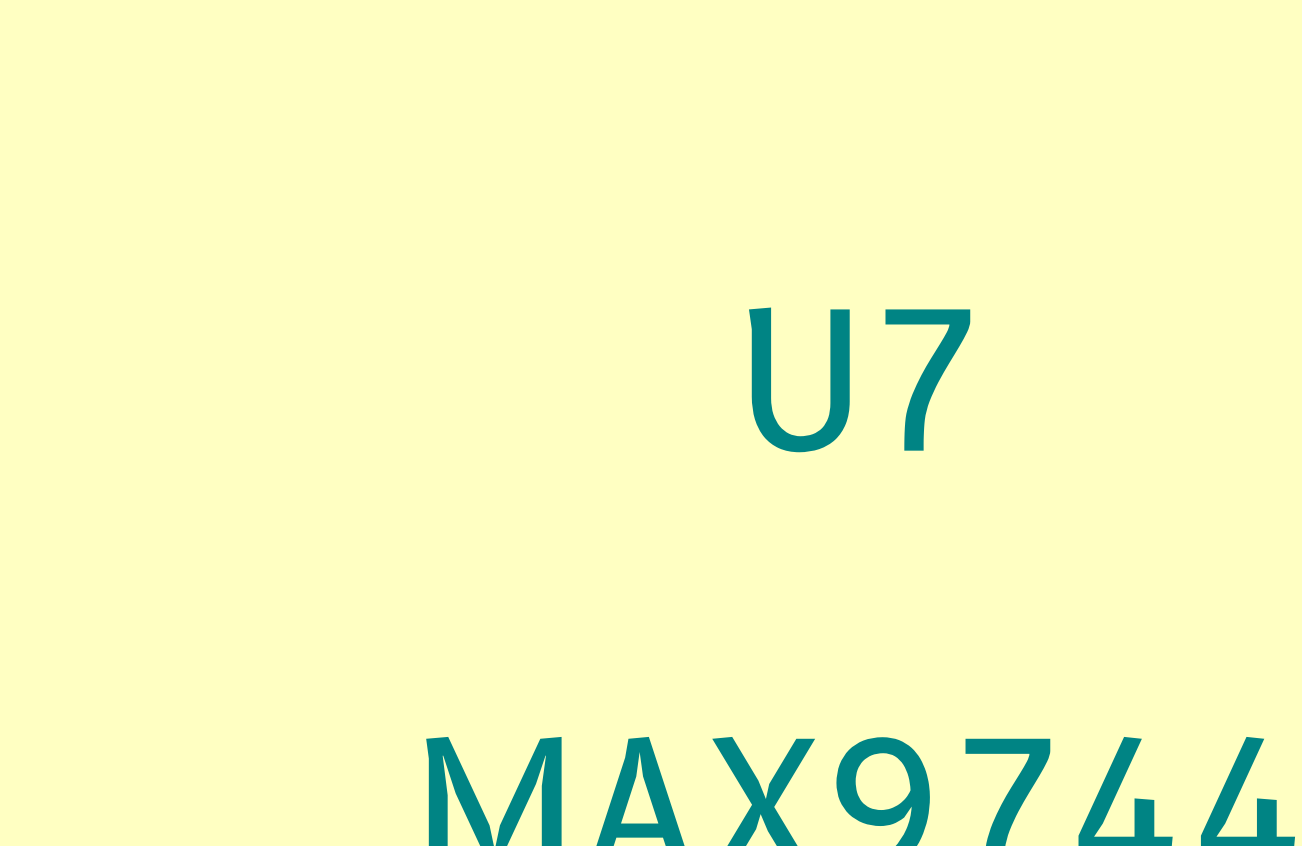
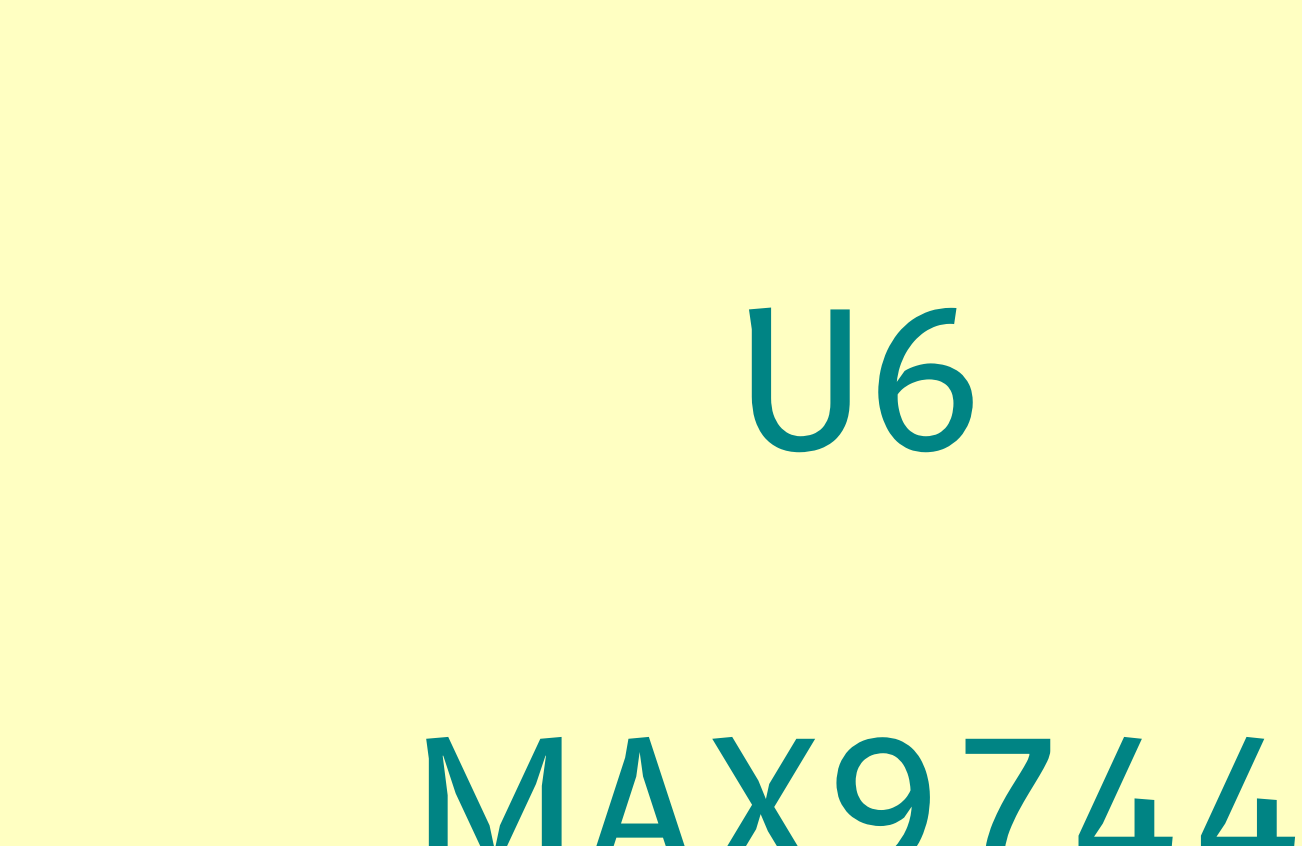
U7 name: U7 (859, 379) -> U6 (860, 379)

